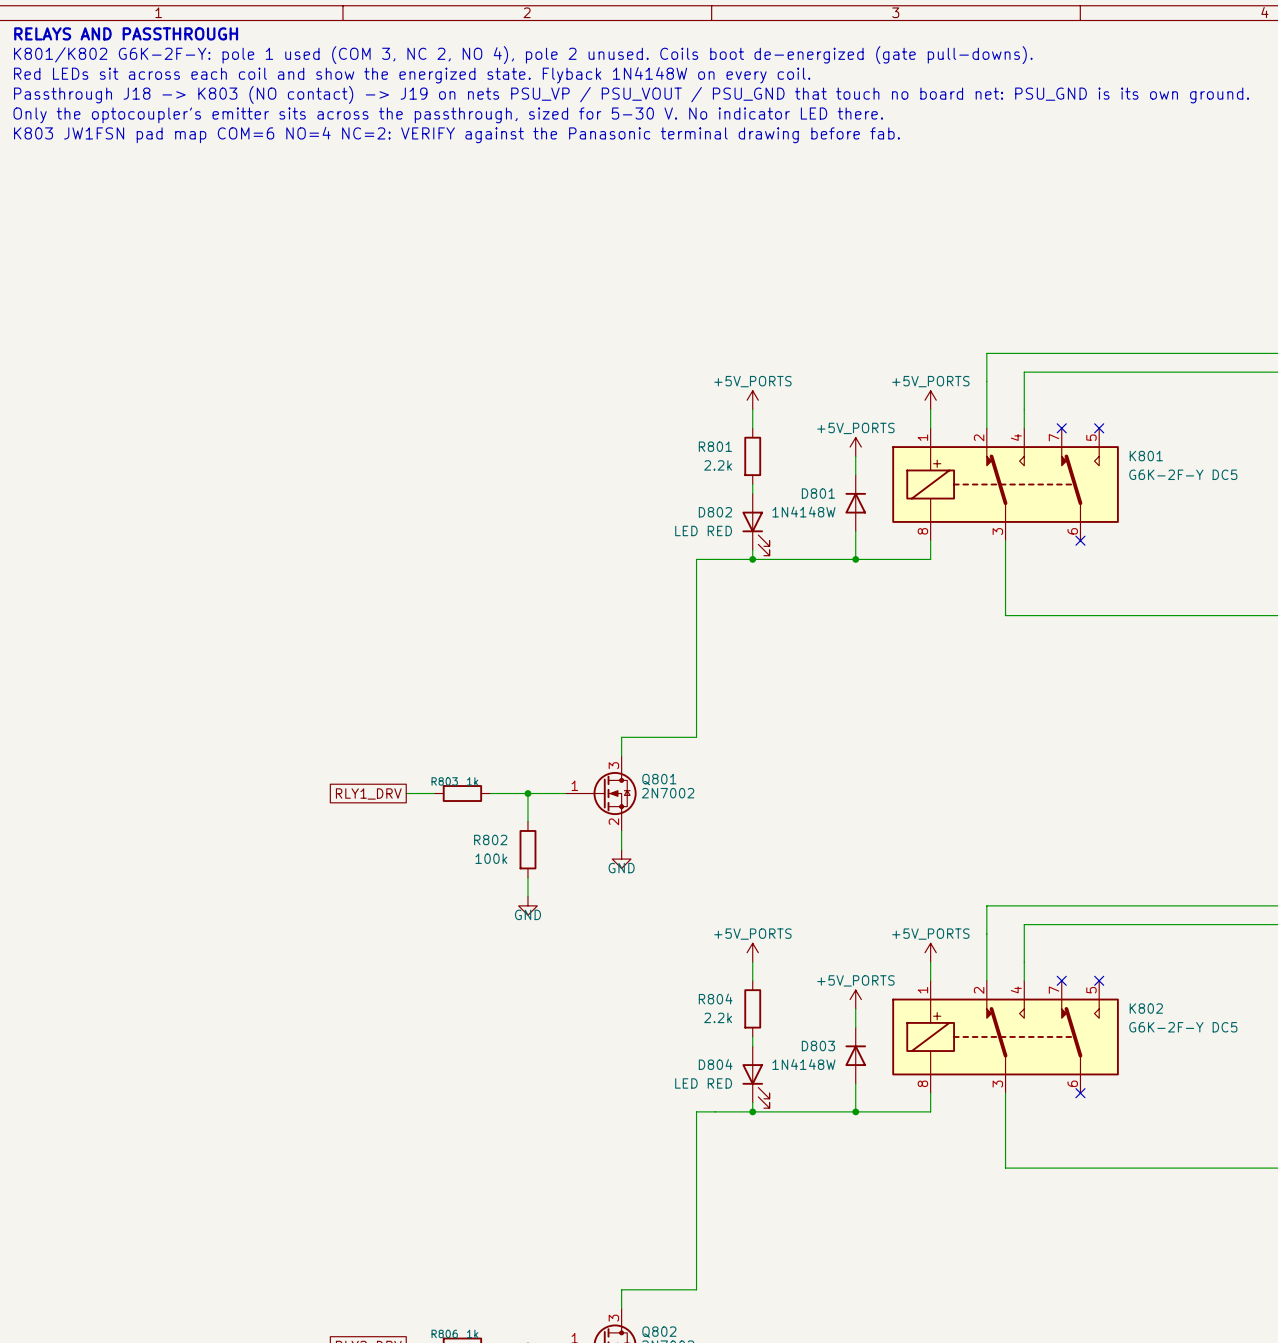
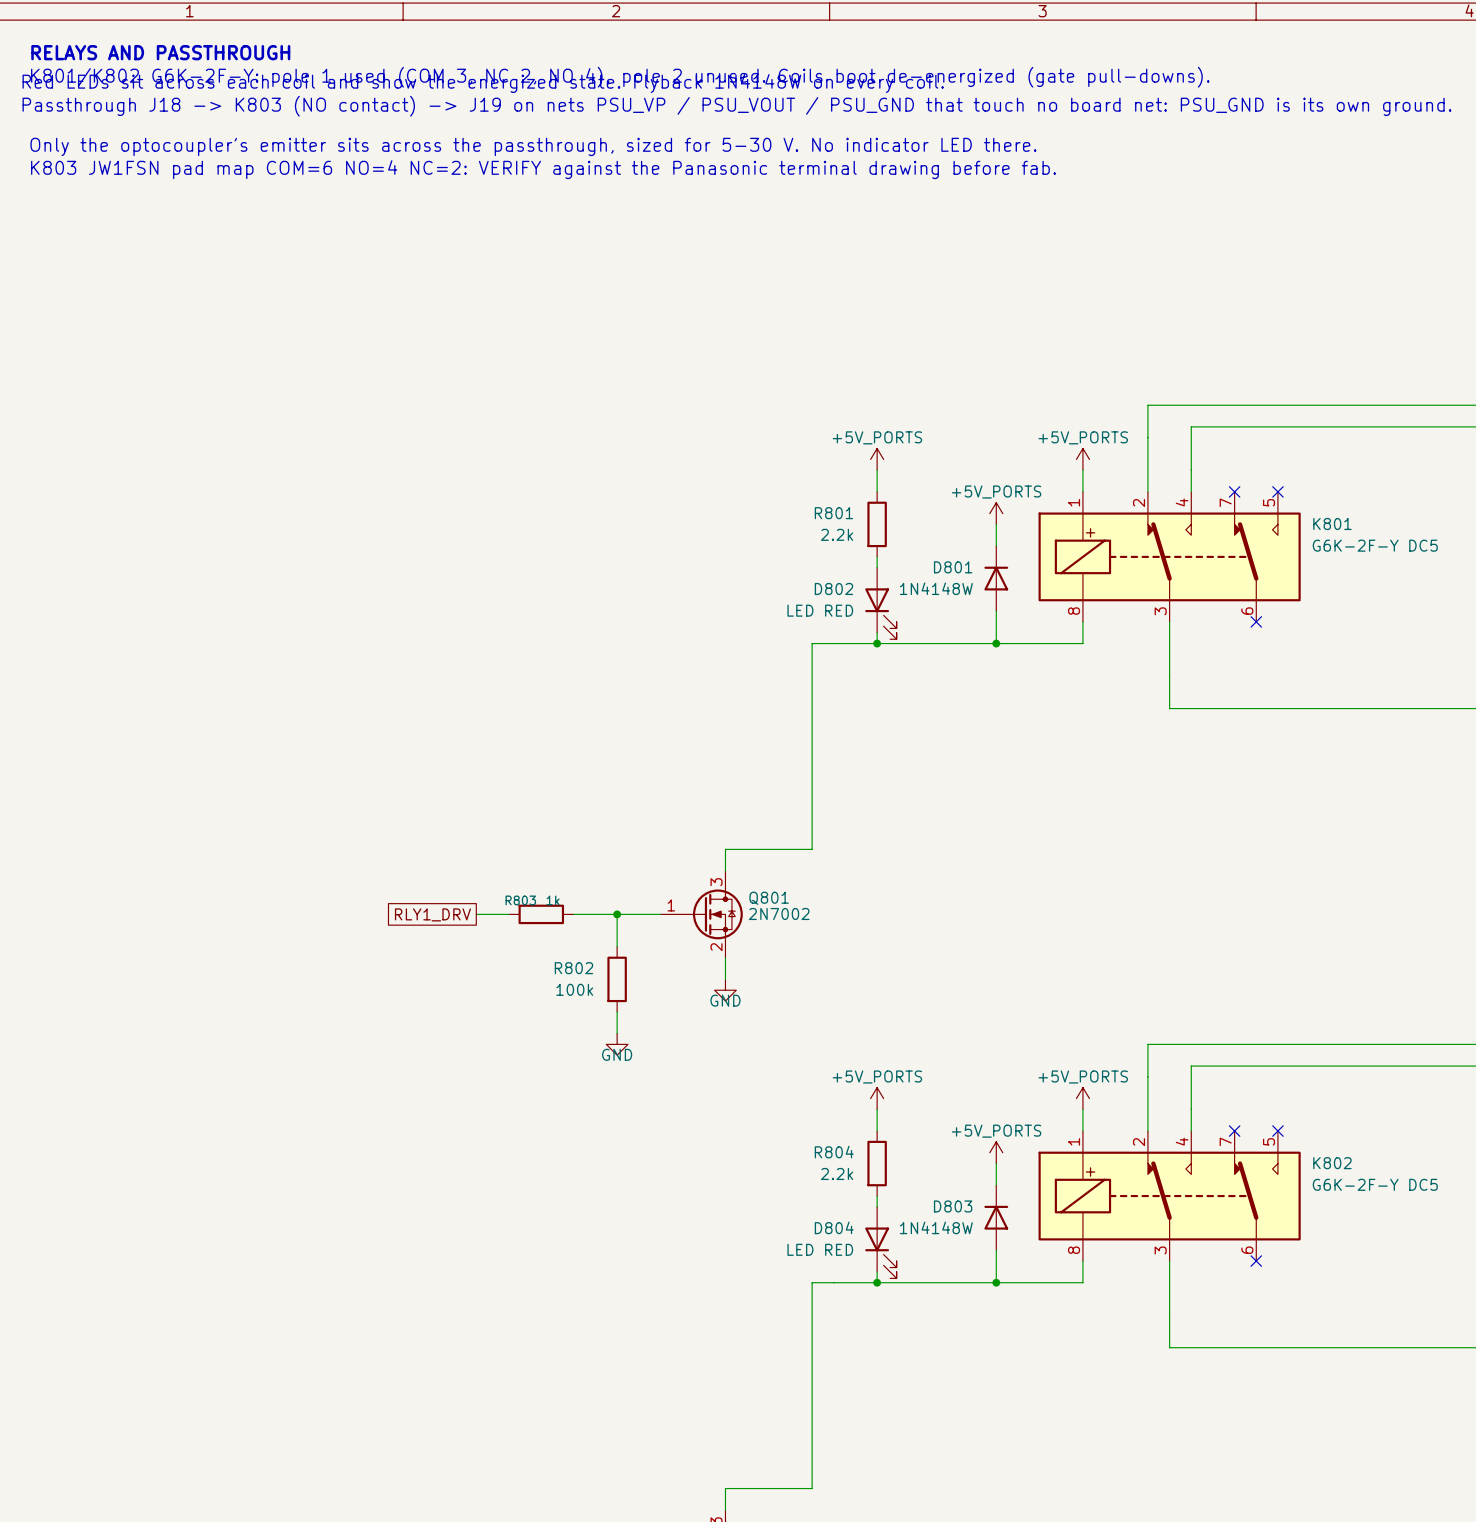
text position: RELAYS AND PASSTHROUGH (126, 33) -> RELAYS AND PASSTHROUGH (160, 52)
text position: K801/K802 G6K-2F-Y: pole 1 used (COM 3, NC 2, NO 4), pole 2 unused. Coils boot de-energized (gate pull-downs). (523, 55) -> K801/K802 G6K-2F-Y: pole 1 used (COM 3, NC 2, NO 4), pole 2 unused. Coils boot de-energized (gate pull-downs). (620, 77)
text position: Only the optocoupler's emitter sits across the passthrough, sized for 5-30 V. No indicator LED there. (448, 115) -> Only the optocoupler's emitter sits across the passthrough, sized for 5-30 V. No indicator LED there. (533, 146)
text position: K803 JW1FSN pad map COM=6 NO=4 NC=2: VERIFY against the Panasonic terminal drawing before fab. (456, 135) -> K803 JW1FSN pad map COM=6 NO=4 NC=2: VERIFY against the Panasonic terminal drawing before fab. (543, 169)

